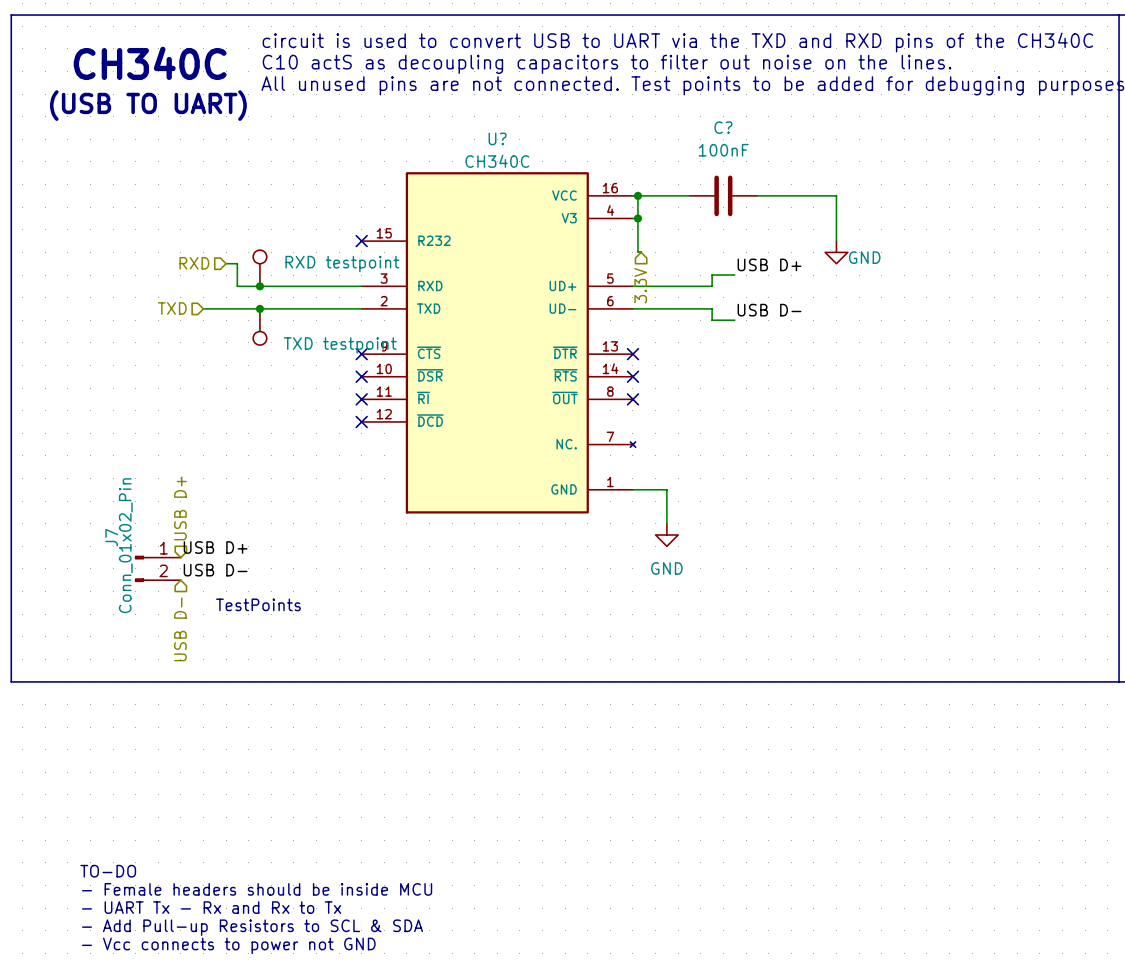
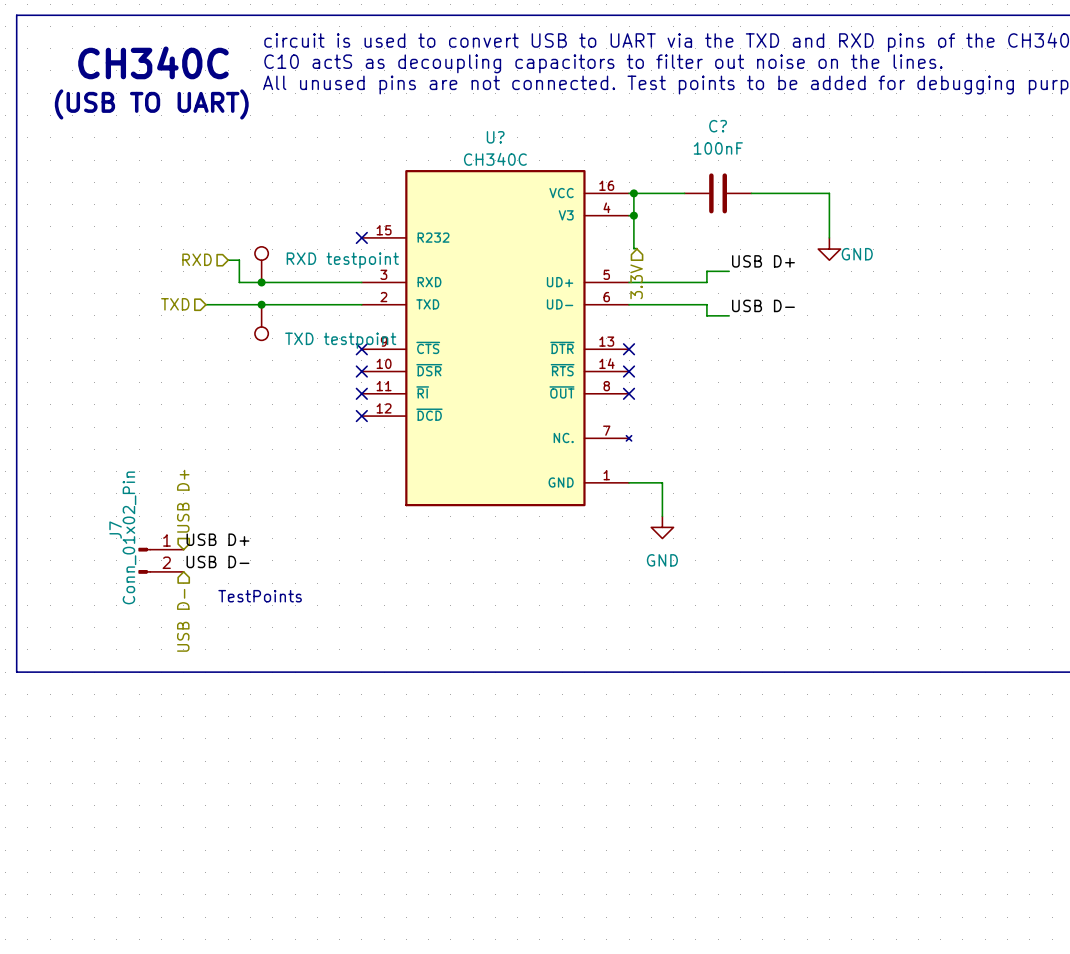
text: TO-DO (108, 871) -> none
text: - Female headers should be inside MCU (257, 889) -> none
text: - UART Tx - Rx and Rx to Tx (211, 907) -> none
text: - Add Pull-up Resistors to SCL & SDA (252, 927) -> none
text: - Vcc connects to power not GND (228, 945) -> none

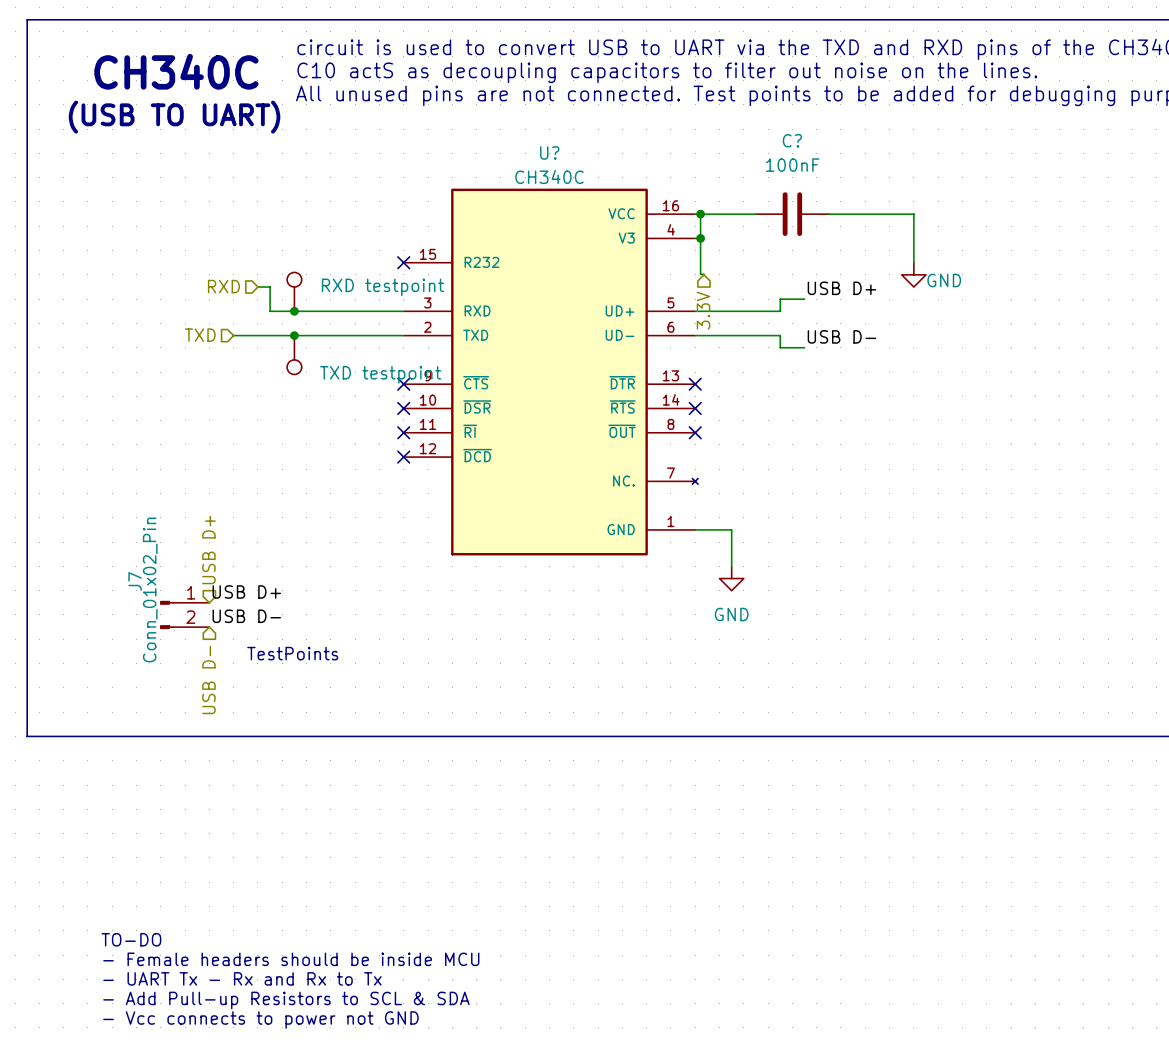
text: none -> TO-DO (131, 939)
text: none -> - Female headers should be inside MCU (291, 959)
text: none -> - UART Tx - Rx and Rx to Tx (242, 978)
text: none -> - Add Pull-up Resistors to SCL & SDA (286, 1000)
text: none -> - Vcc connects to power not GND (260, 1020)

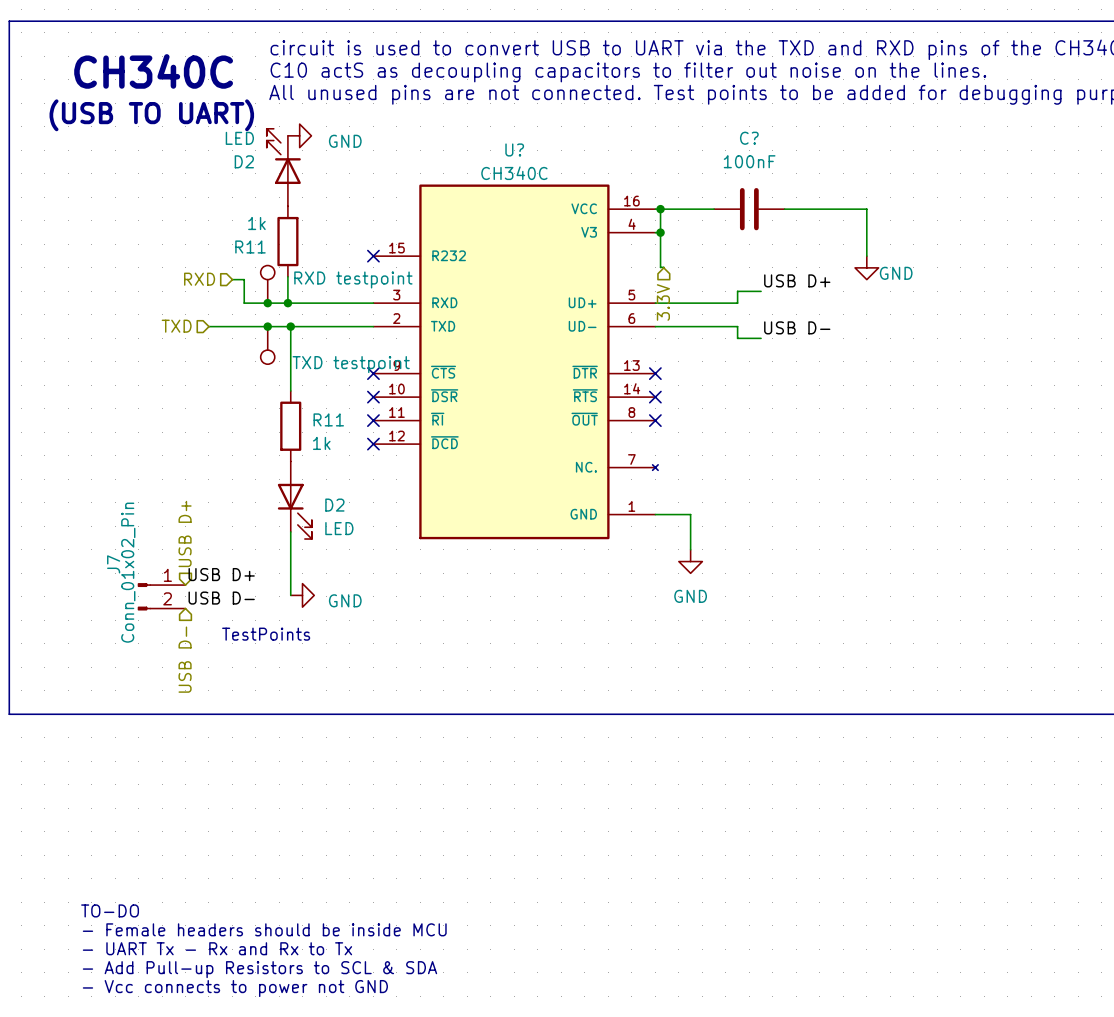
power symbol: none -> GND (299, 135)
D2: none -> LED (283, 167)
R11: none -> 1k (287, 241)
wire: none -> (287, 276) (287, 303)
junction: none -> (287, 303)
wire: none -> (290, 326) (290, 390)
junction: none -> (290, 326)
R11: none -> 1k (290, 426)
D2: none -> LED (294, 500)
wire: none -> (290, 531) (290, 595)
power symbol: none -> GND (302, 595)

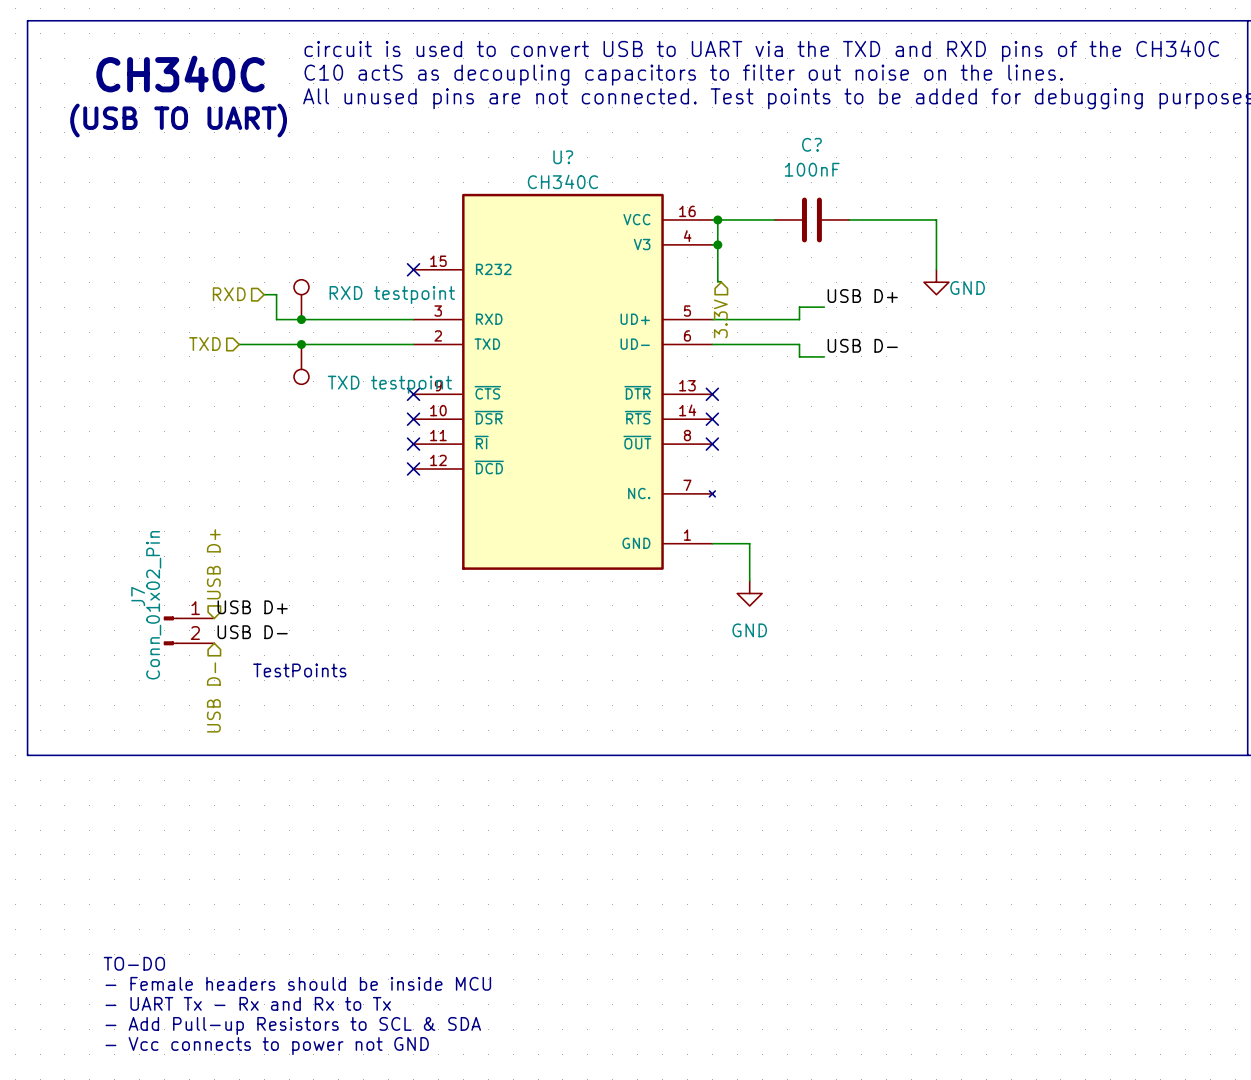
power symbol: GND (299, 135) -> none
D2: LED (283, 167) -> none
R11: 1k (287, 241) -> none
wire: (287, 276) (287, 303) -> none
junction: (287, 303) -> none
wire: (290, 326) (290, 390) -> none
junction: (290, 326) -> none
R11: 1k (290, 426) -> none
D2: LED (294, 500) -> none
wire: (290, 531) (290, 595) -> none
power symbol: GND (302, 595) -> none

